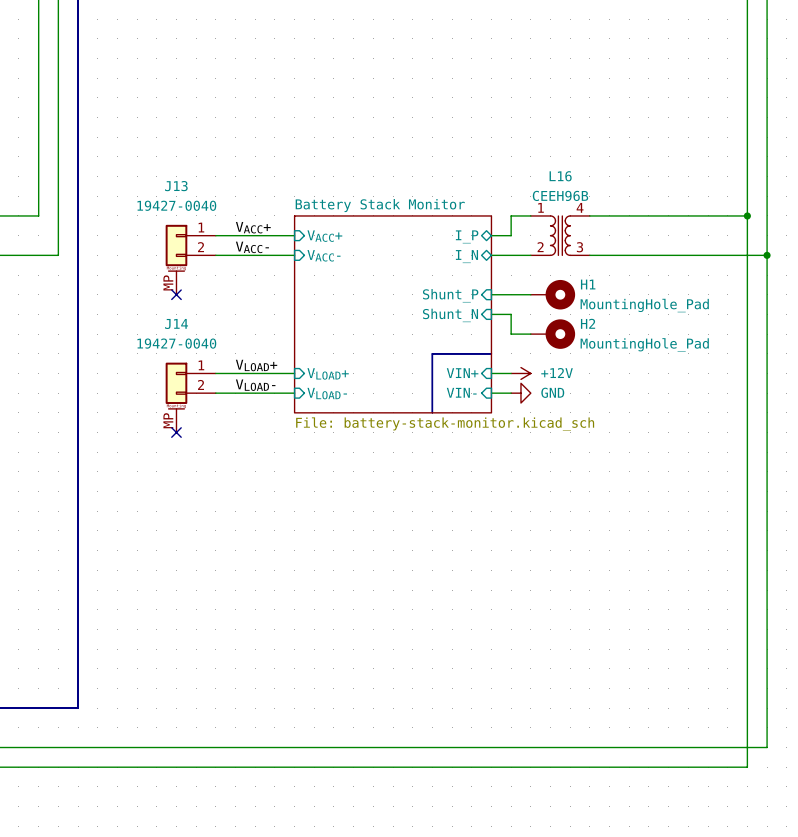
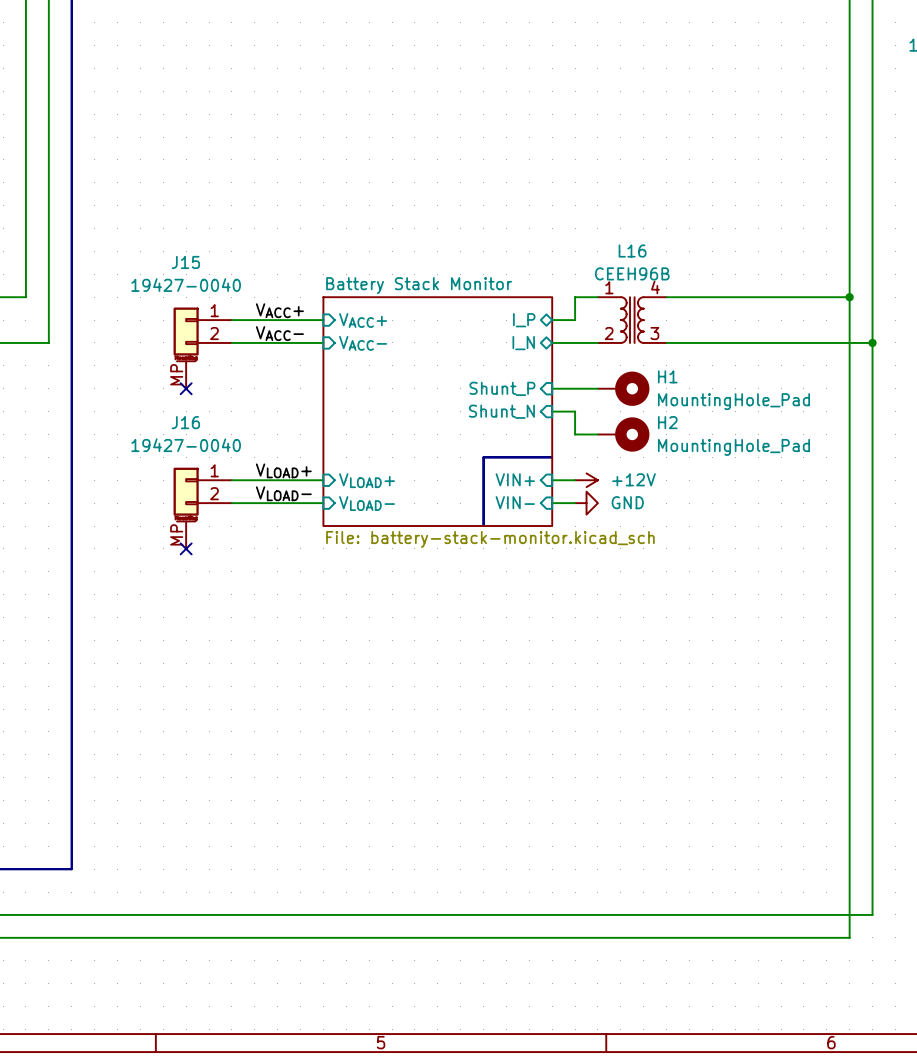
J13 name: J13 (176, 186) -> J15 (185, 262)
J14 name: J14 (176, 323) -> J16 (185, 422)

